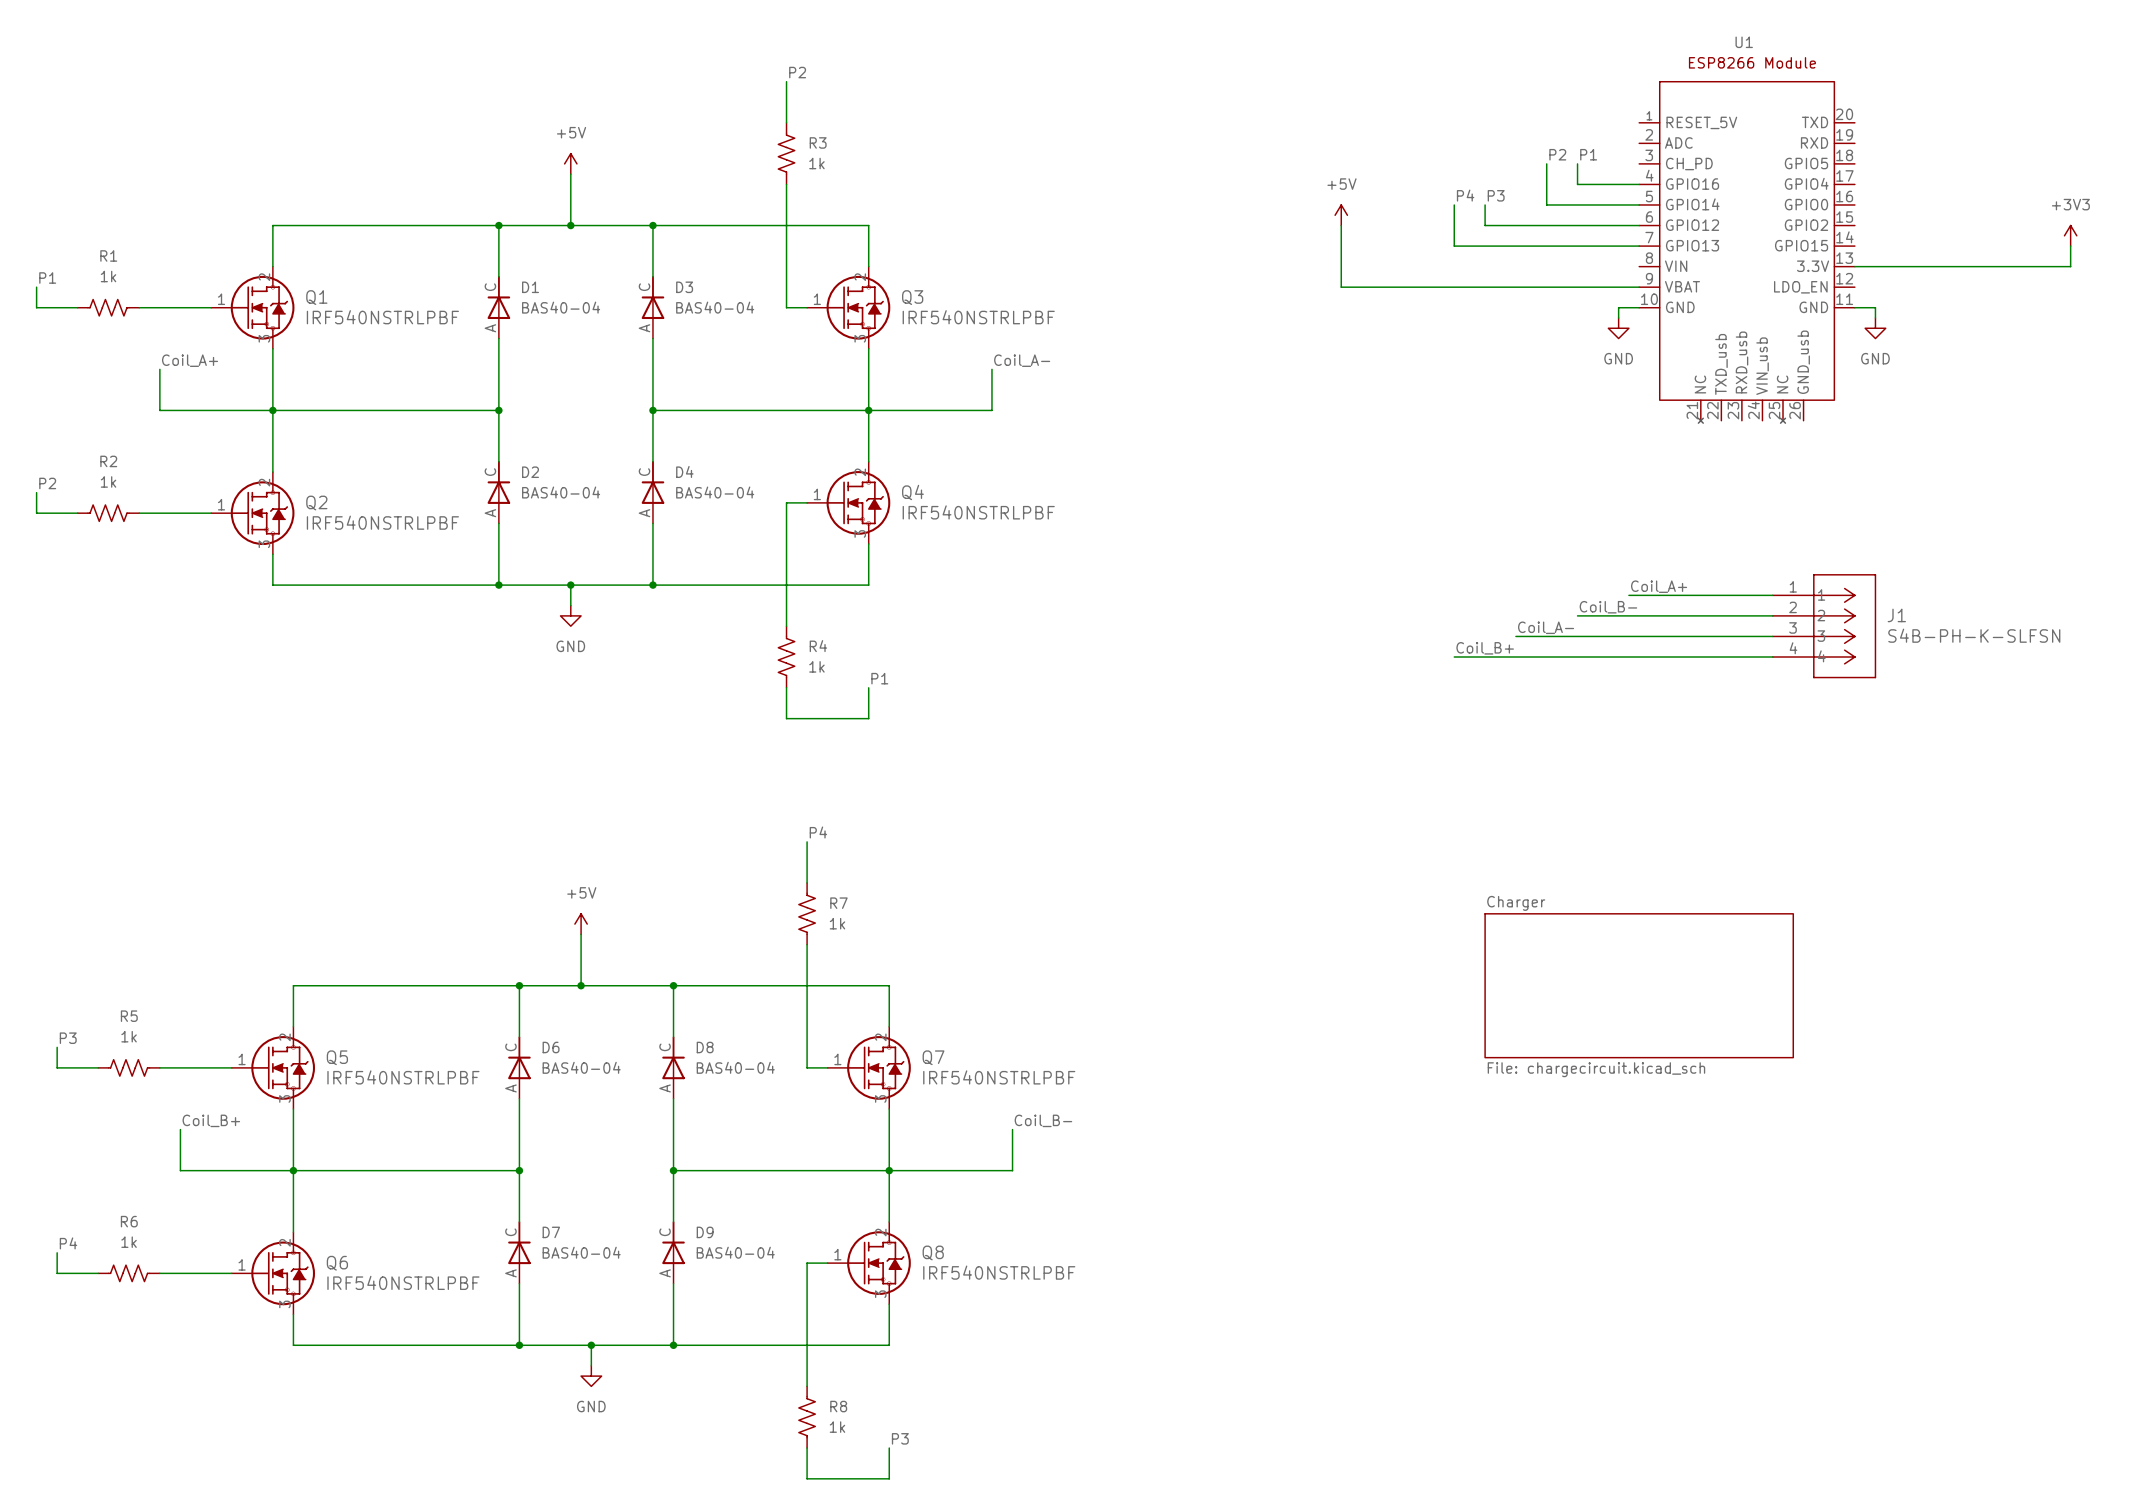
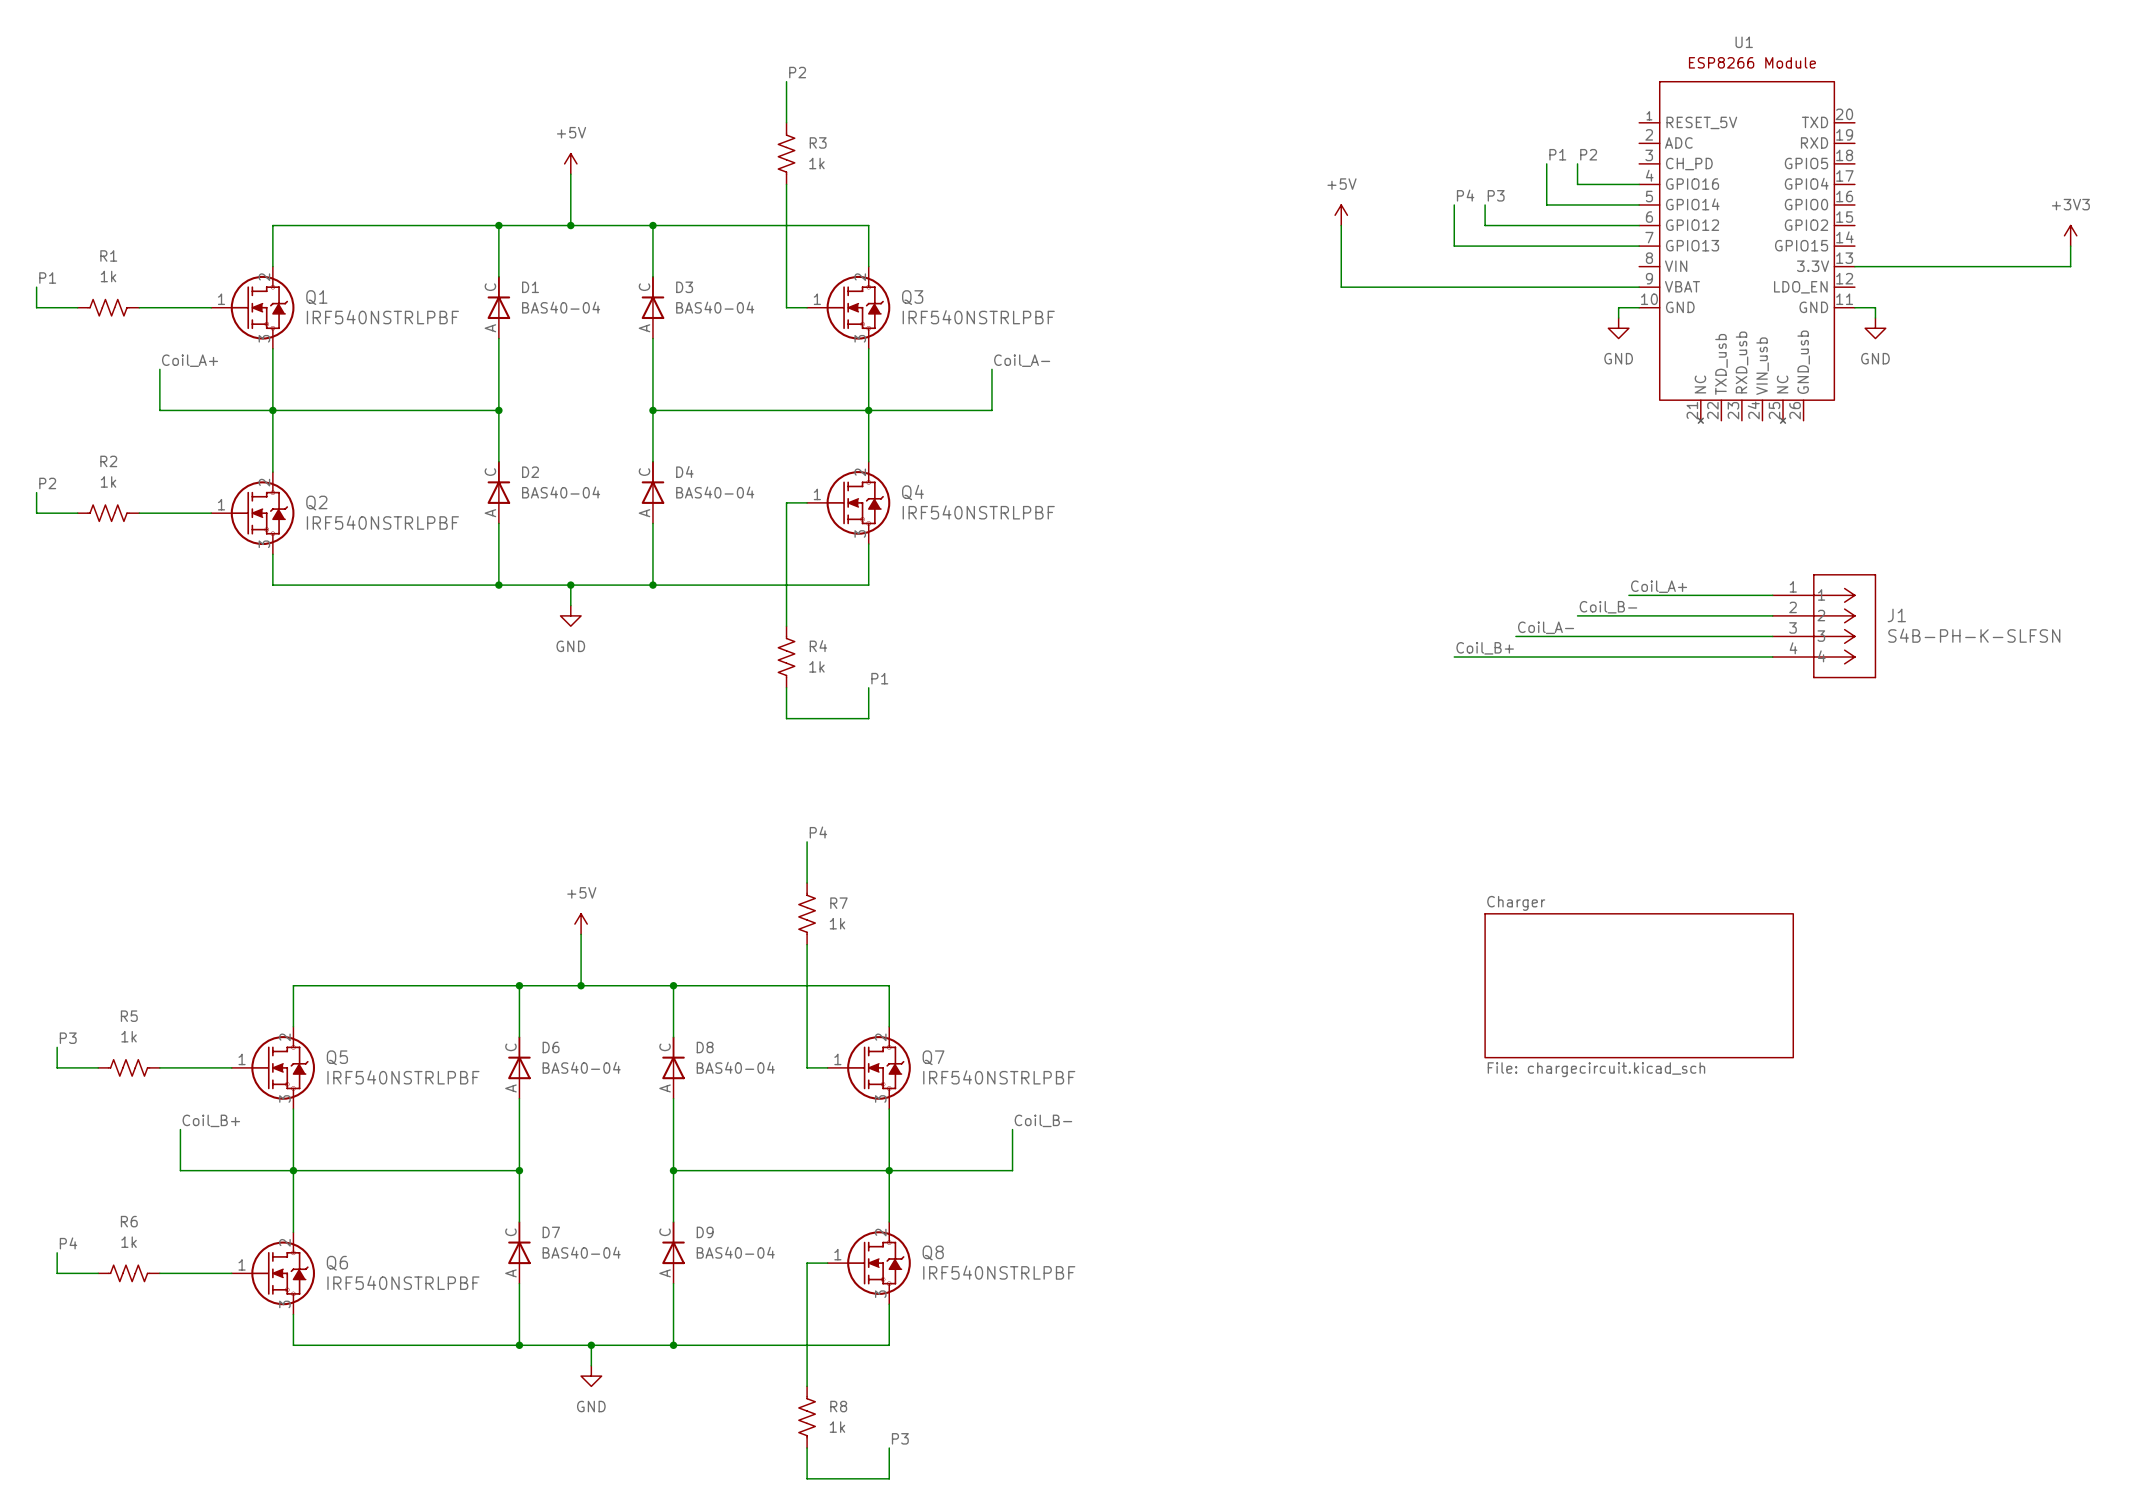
label: P2 (1557, 154) -> P1 (1557, 154)
label: P1 (1588, 154) -> P2 (1588, 154)

